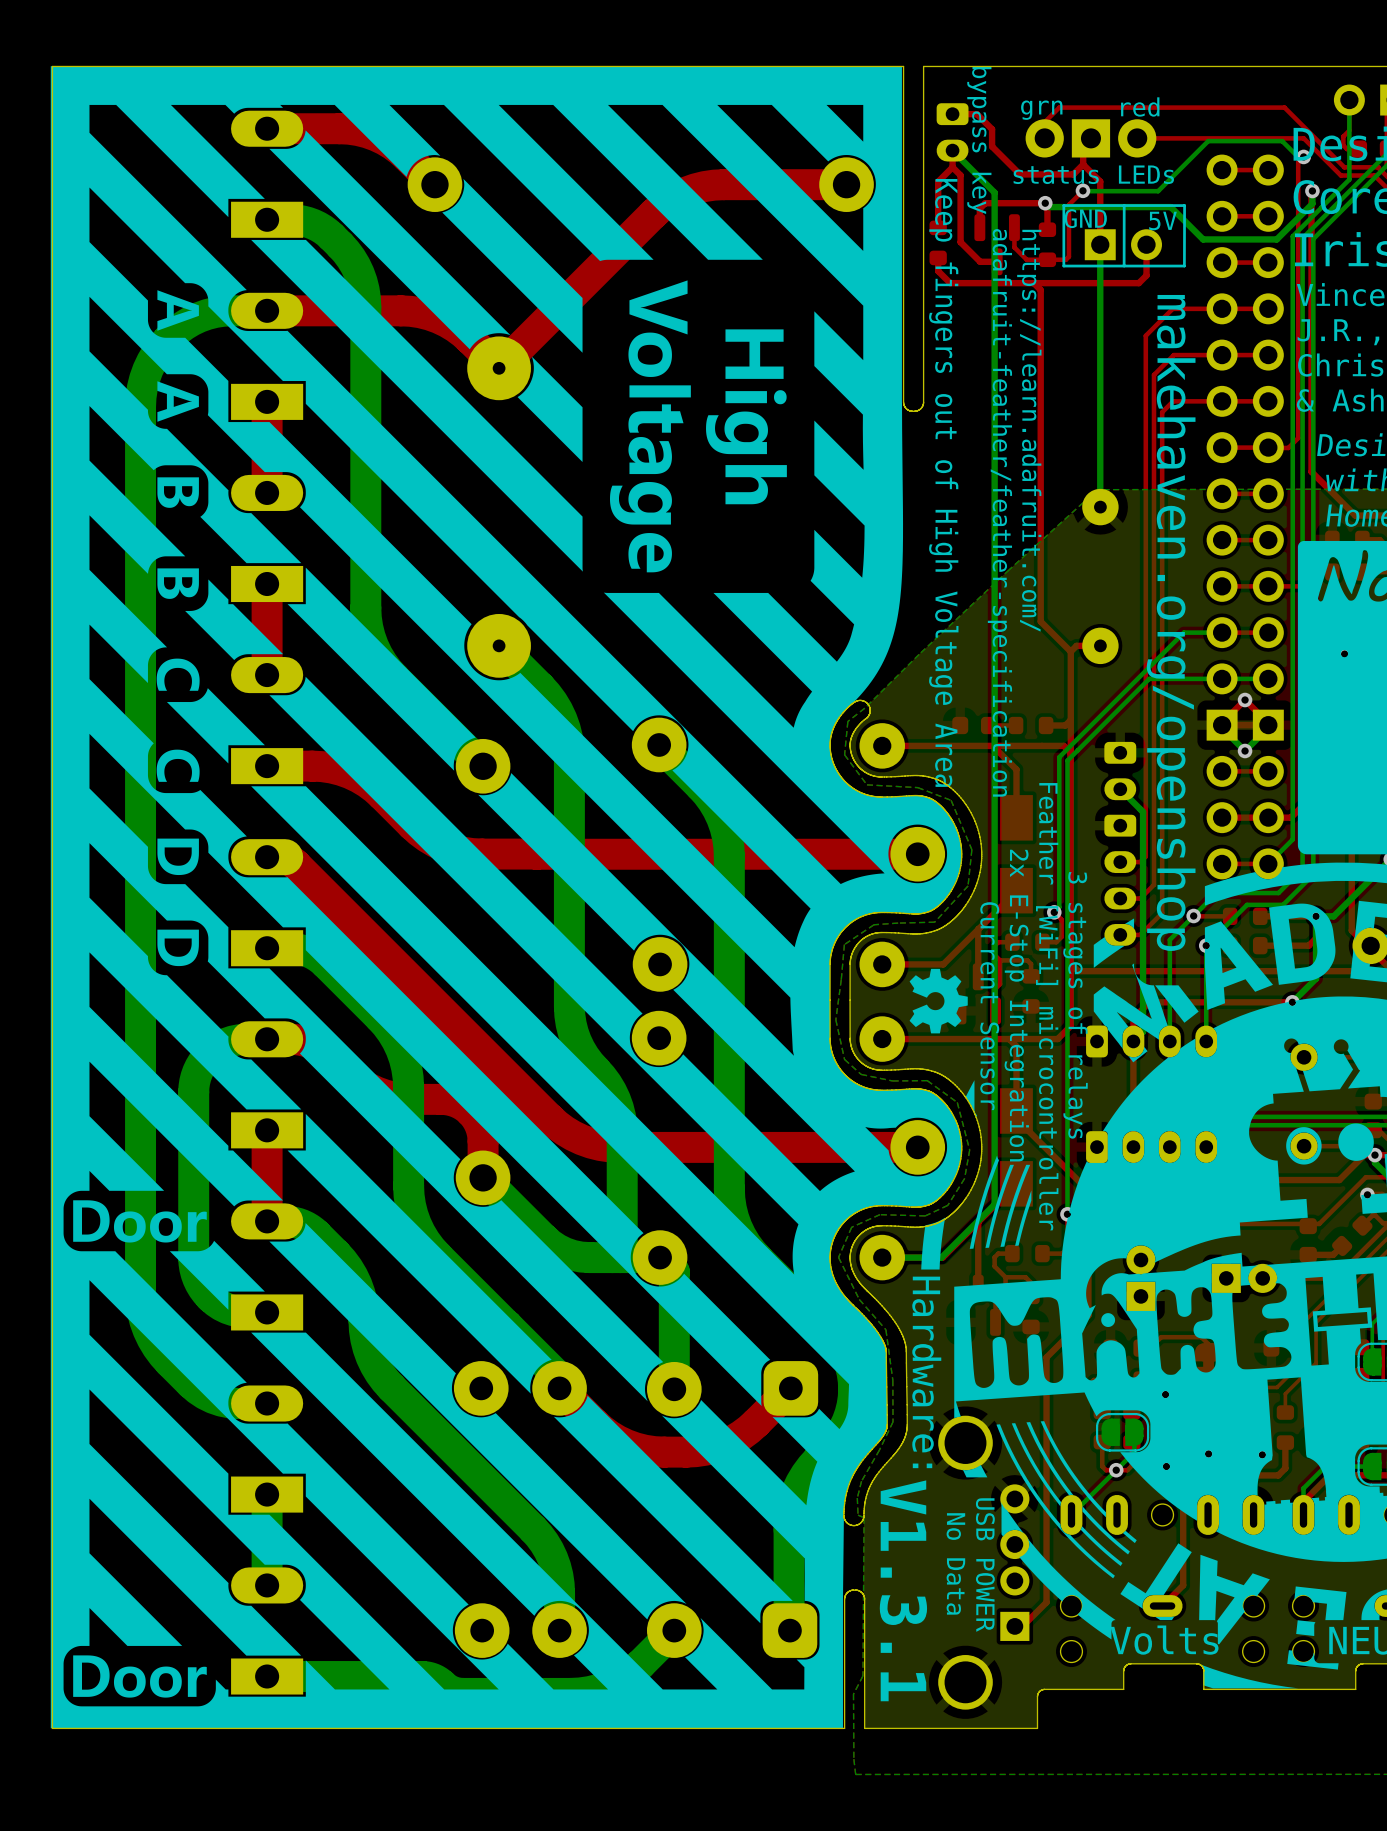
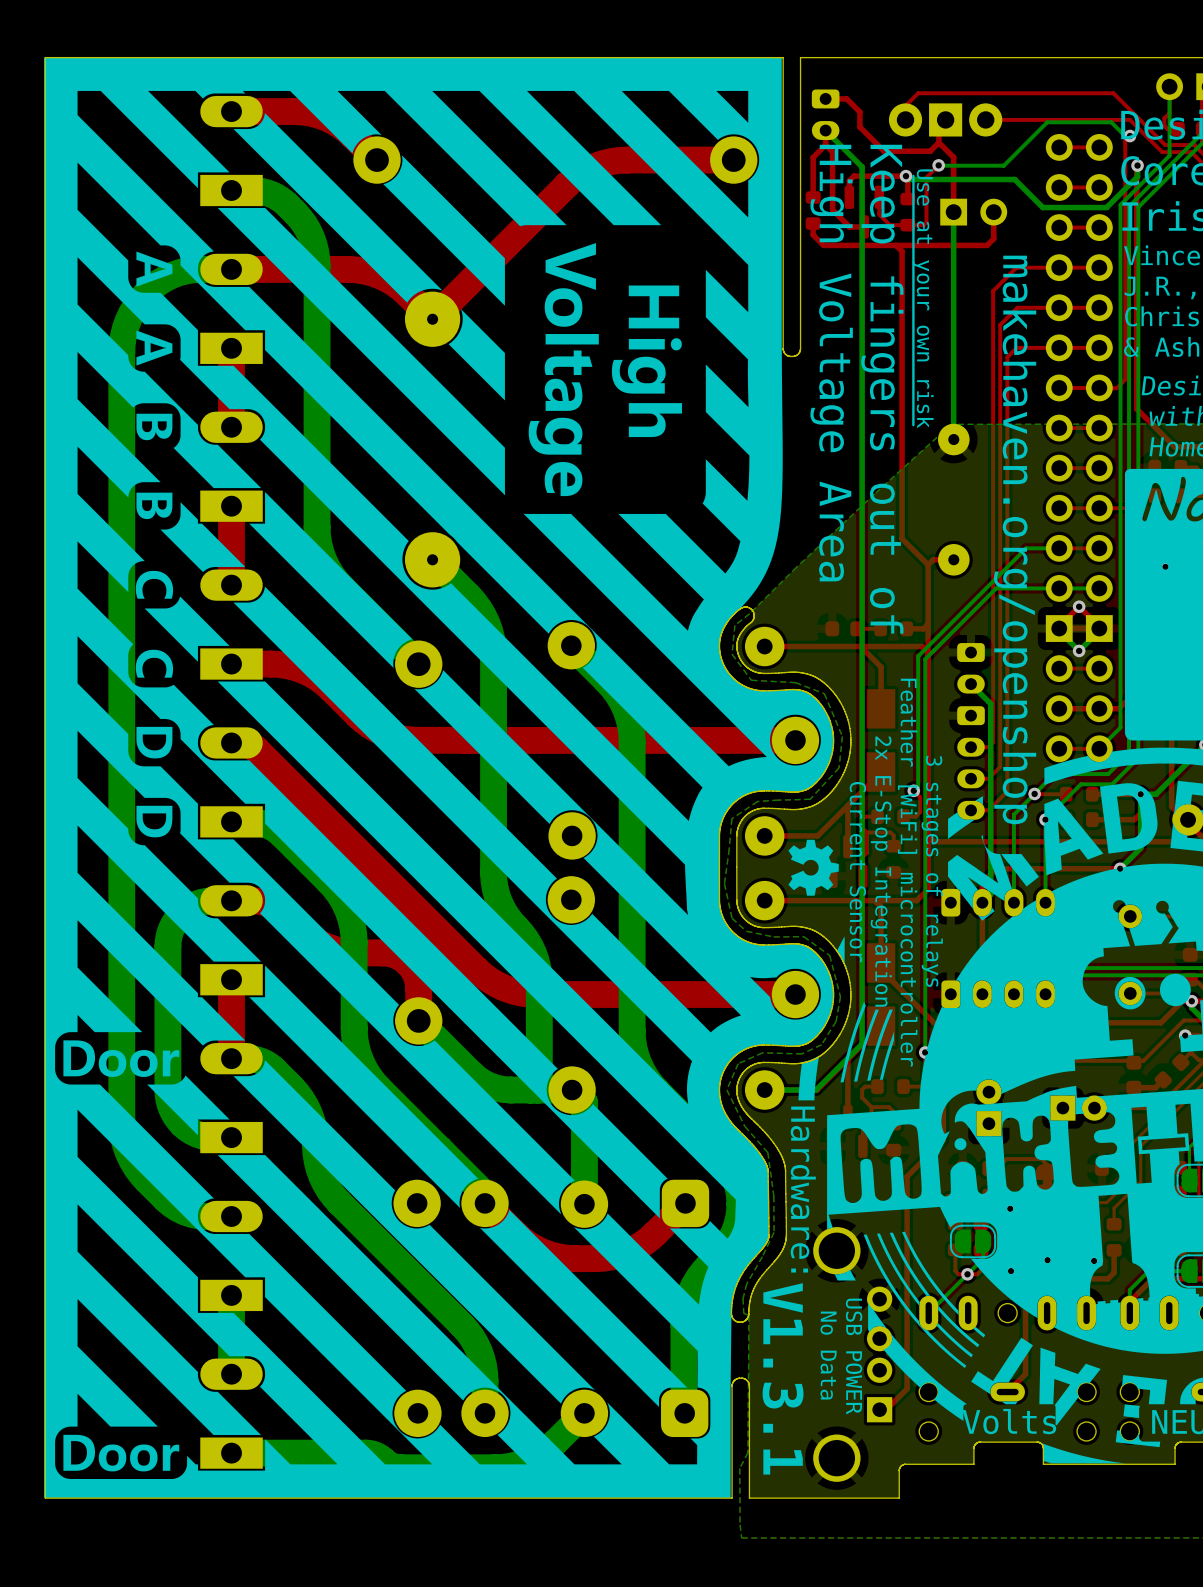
text: red (1140, 106) -> none
text: grn (1041, 110) -> none
text: bypass key (979, 140) -> none
text: status LEDs (1093, 174) -> none
line: none -> (913, 175) (913, 425)
line: (1124, 205) (1124, 266) -> none
line: (1184, 205) (1063, 205) (1063, 266) (1184, 266) (1184, 205) -> none
text: GND (1085, 218) -> none
text: 5V (1162, 221) -> none
text: none -> Use at your own risk (923, 298)
text: https://learn.adafruit.com/ (1029, 430) -> none
text: none -> Keep fingers out of (882, 389)
text: Keep fingers out of High Voltage Area (943, 482) -> High Voltage Area (831, 363)
text: adafruit-feather/feather-specification (999, 512) -> none

